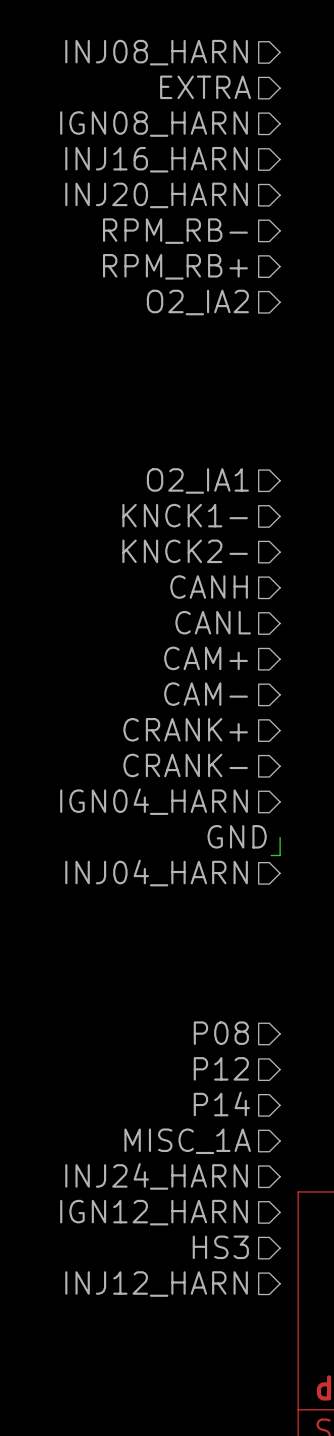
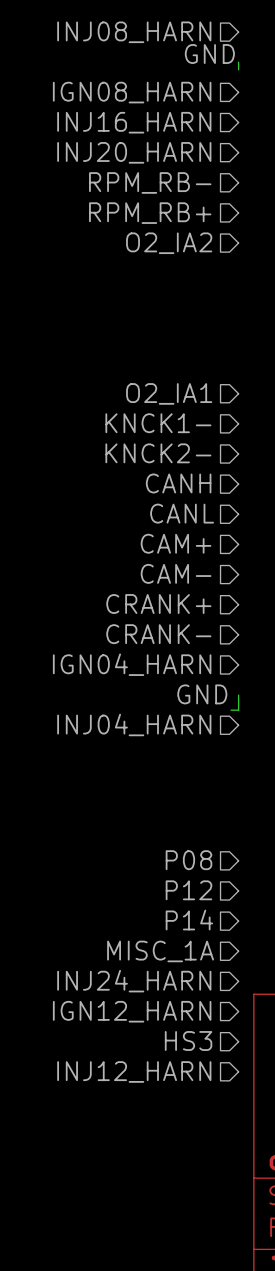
label: none -> GND (209, 54)
hierarchical label: EXTRA (205, 87) -> none
wire: none -> (238, 62) (238, 69)

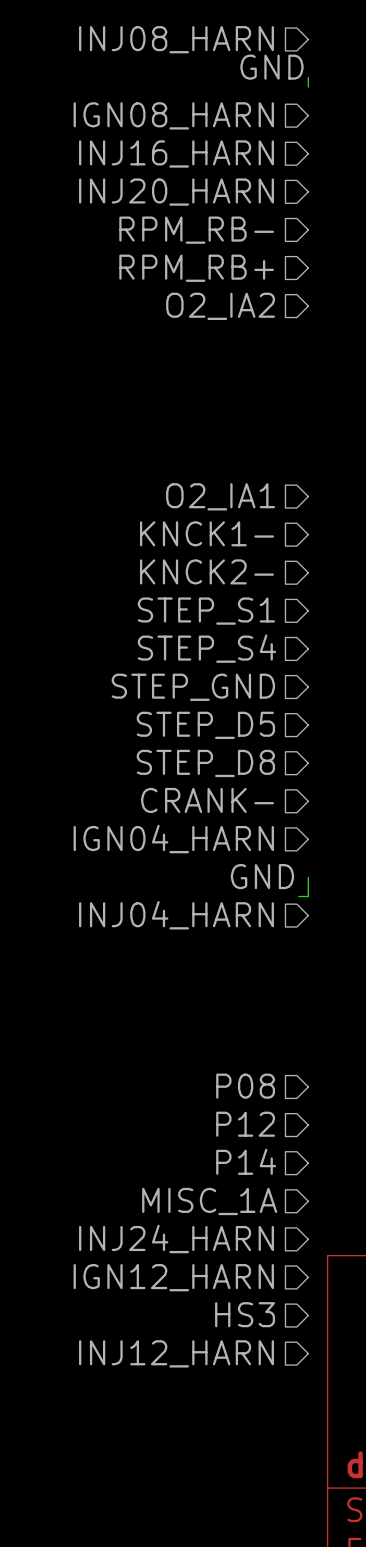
hierarchical label: CANH (178, 483) -> STEP_S1 (206, 611)
hierarchical label: CANL (182, 513) -> STEP_S4 (206, 648)
hierarchical label: CAM+ (176, 543) -> STEP_GND (193, 687)
hierarchical label: CAM- (176, 573) -> STEP_D5 (205, 725)
hierarchical label: CRANK+ (158, 604) -> STEP_D8 (205, 763)

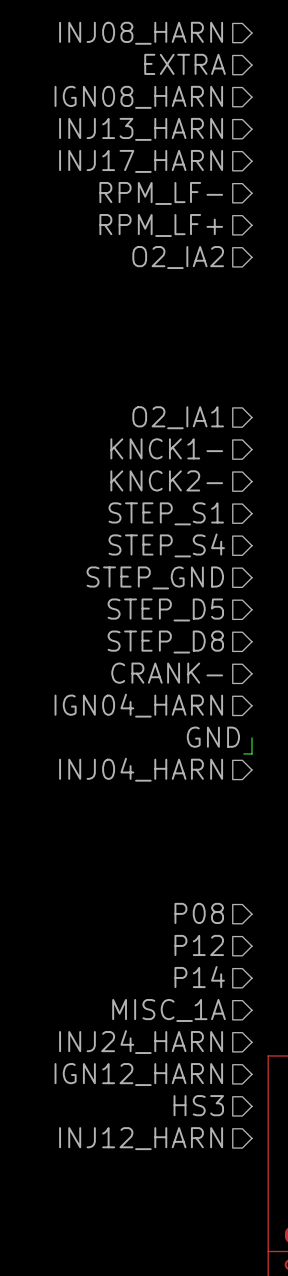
label: GND (271, 67) -> none
hierarchical label: none -> EXTRA (185, 64)
wire: (308, 77) (308, 87) -> none
hierarchical label: INJ16_HARN (176, 153) -> INJ13_HARN (141, 129)
hierarchical label: INJ20_HARN (176, 192) -> INJ17_HARN (141, 161)
hierarchical label: RPM_RB- (196, 230) -> RPM_LF- (161, 193)
hierarchical label: RPM_RB+ (196, 268) -> RPM_LF+ (161, 225)

